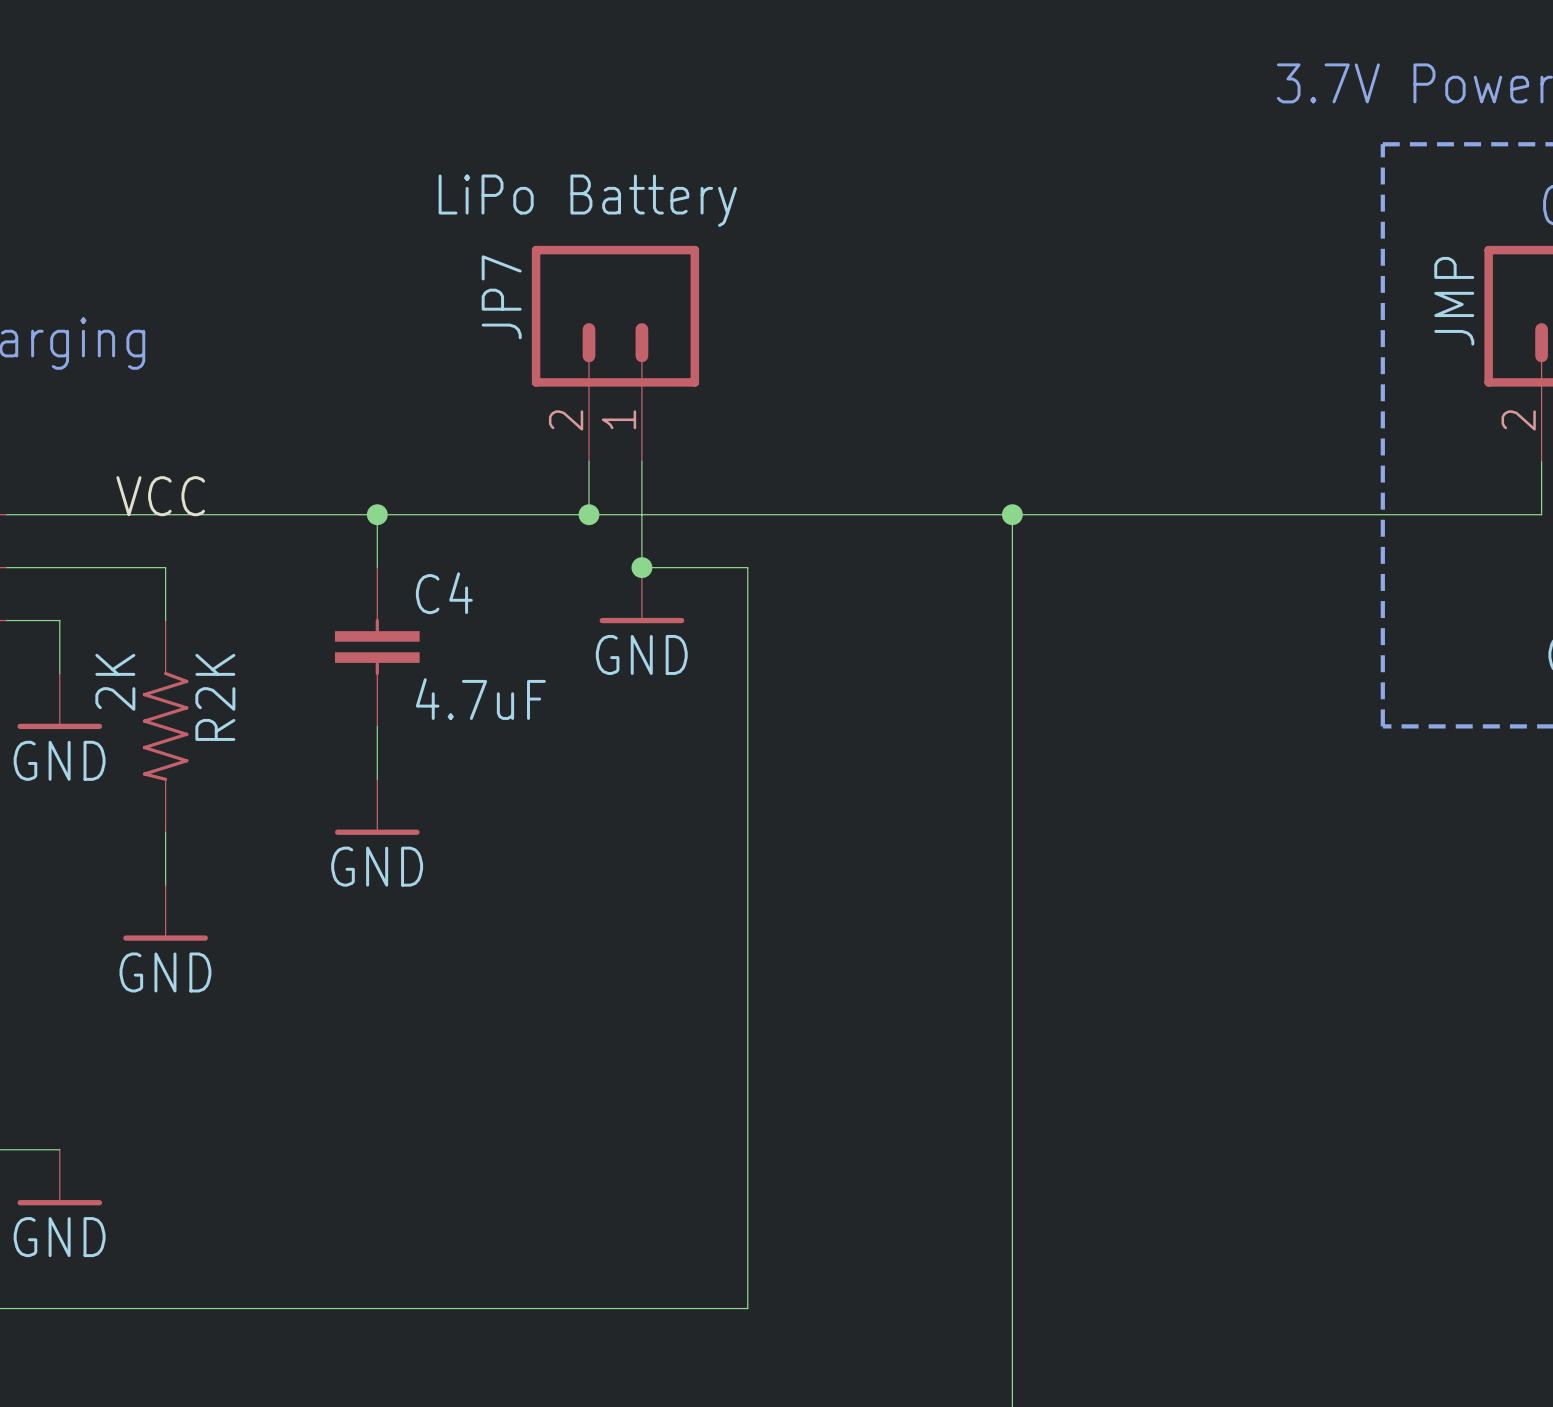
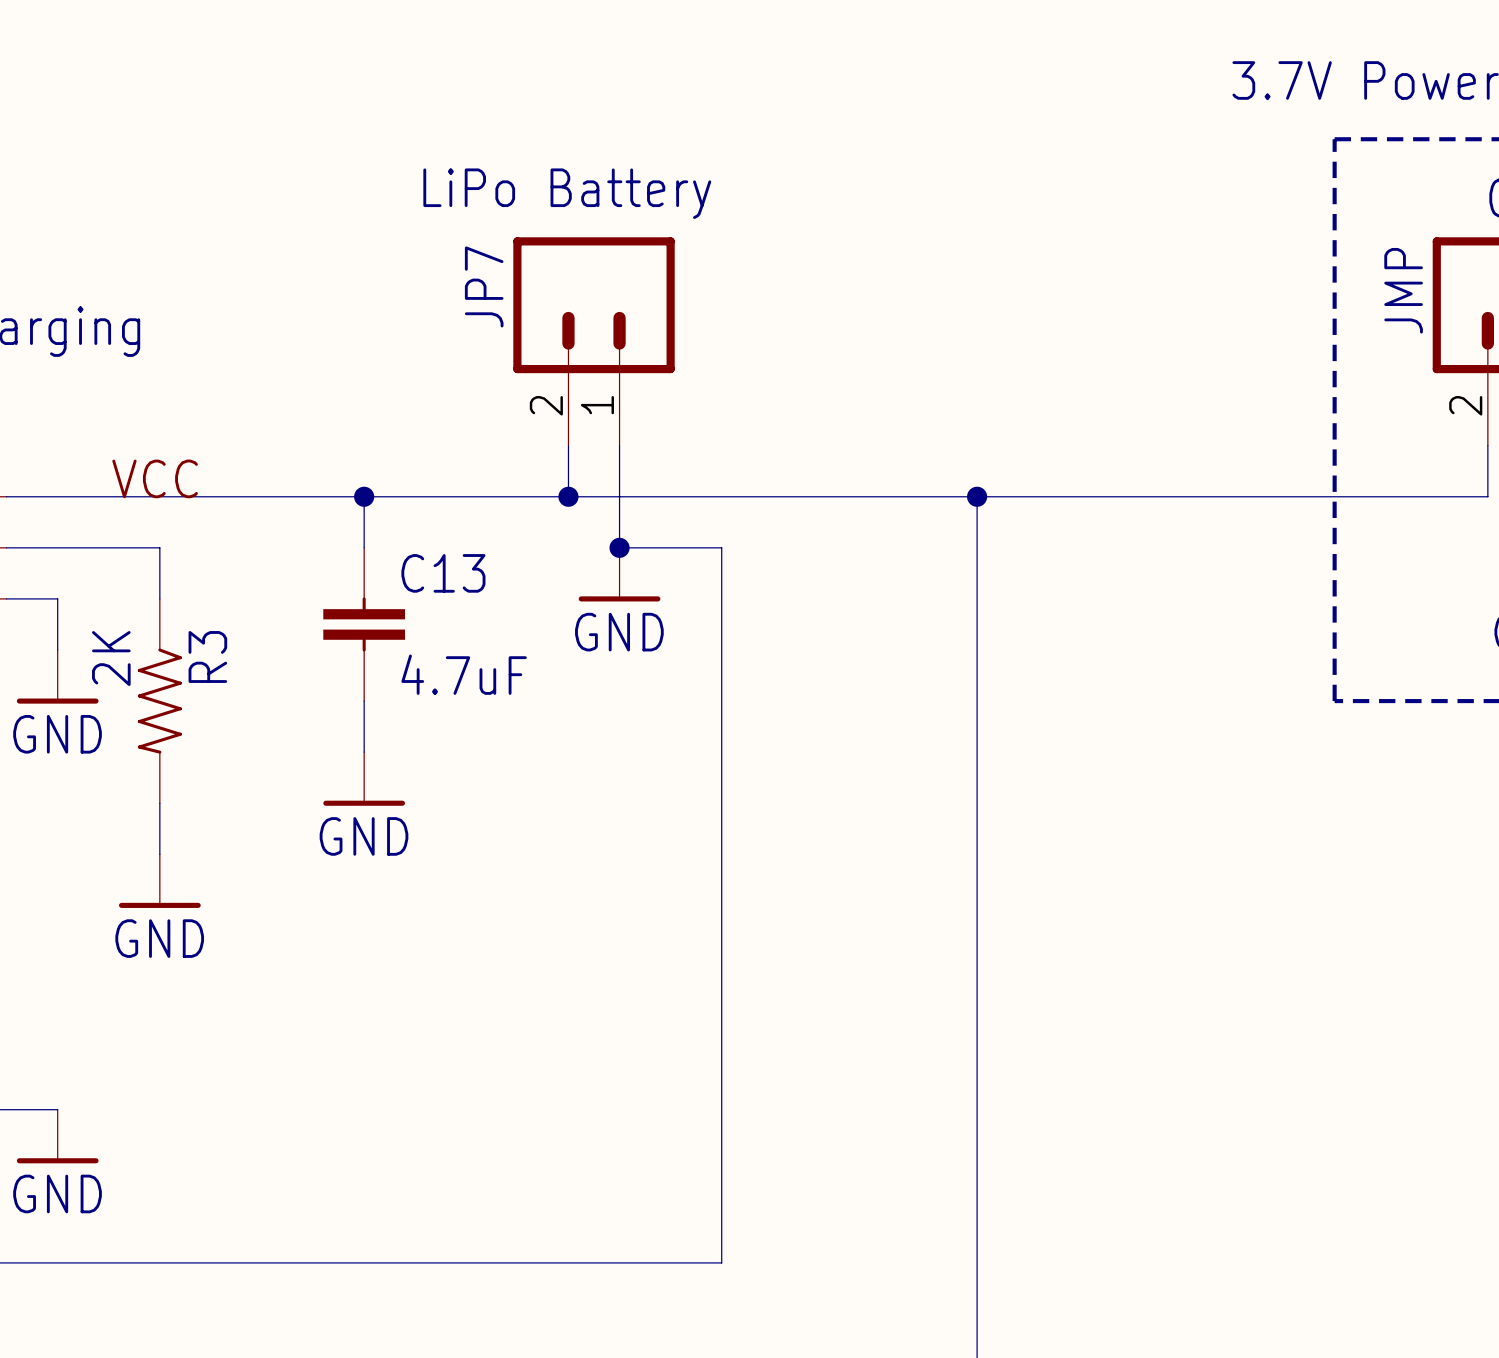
C4 name: C4 (444, 593) -> C13 (443, 573)
R2K name: R2K (215, 697) -> R3 (207, 656)

